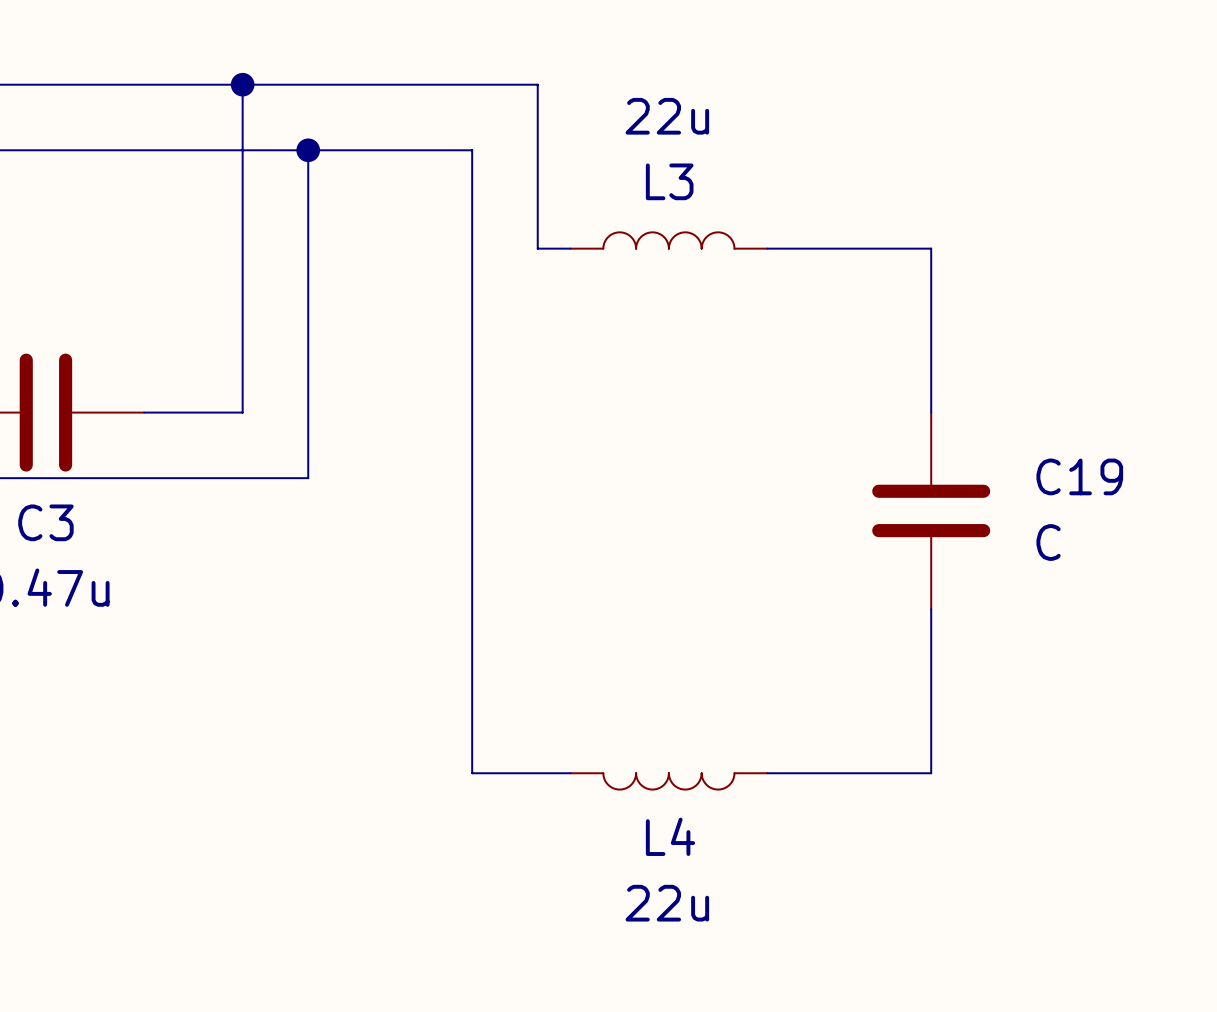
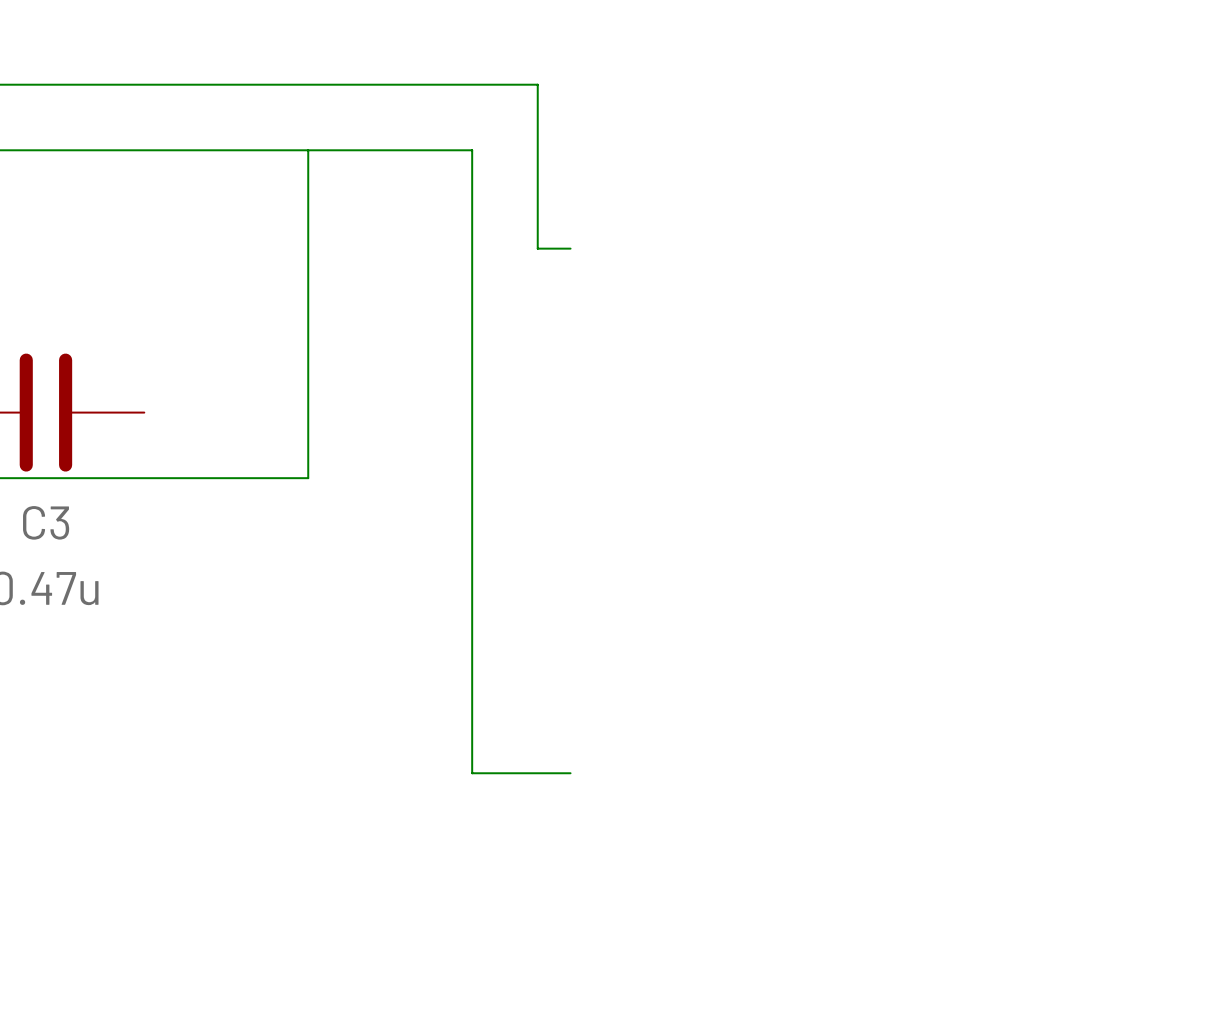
wire: (242, 84) (242, 412) (144, 412) -> none
junction: (242, 84) -> none
junction: (308, 150) -> none
L3: 22u (668, 240) -> none
wire: (767, 248) (931, 248) (931, 412) -> none
C19: C (931, 510) -> none
wire: (931, 609) (931, 773) (767, 773) -> none
L4: 22u (668, 781) -> none

